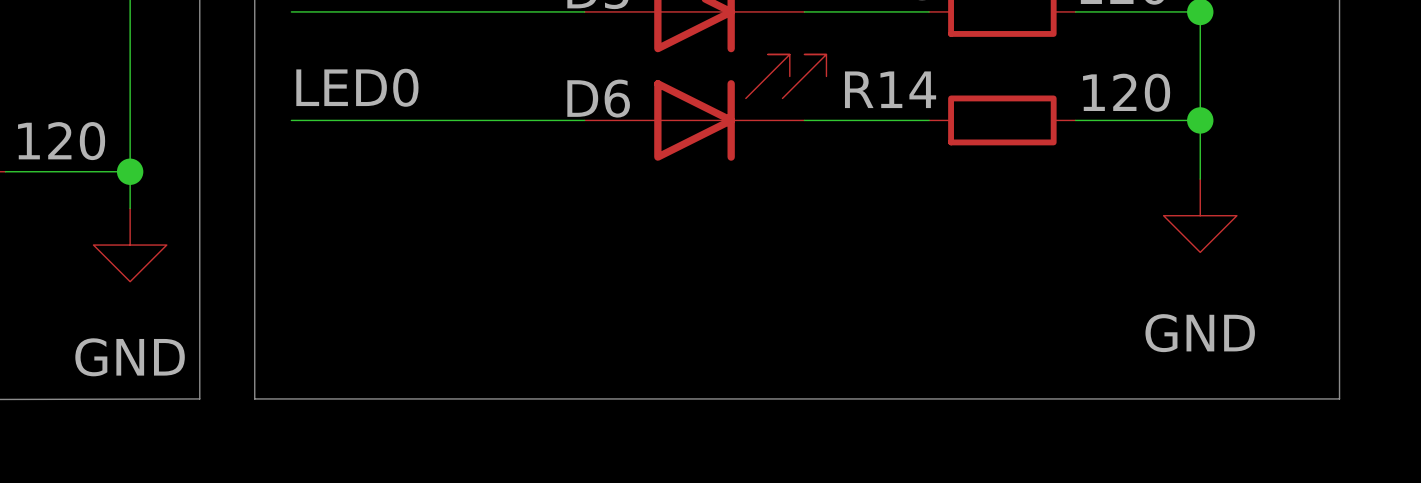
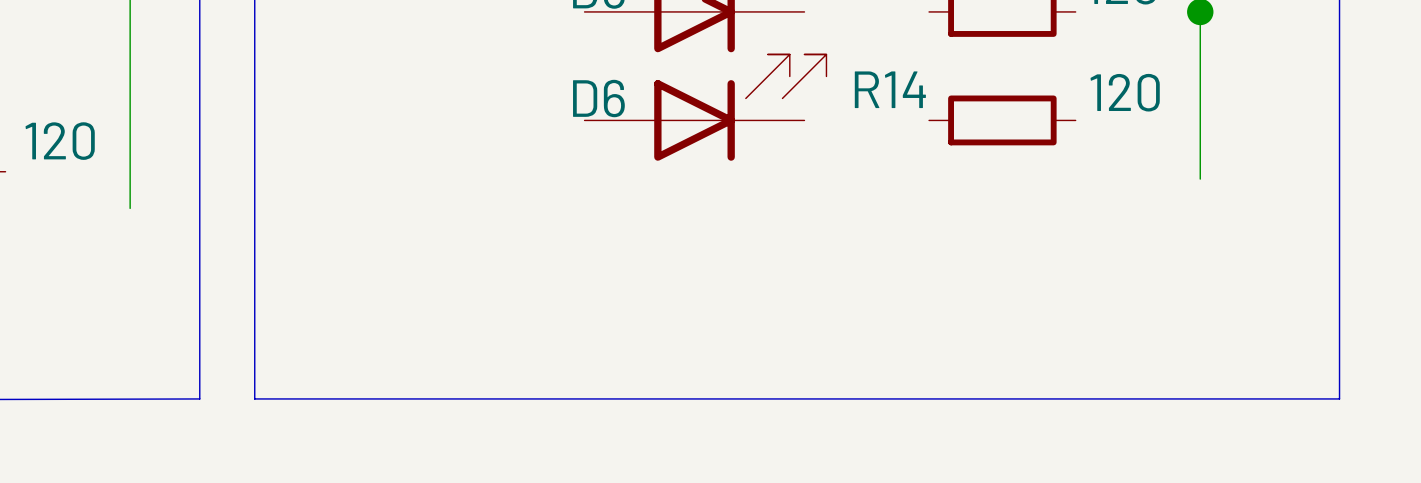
wire: (291, 11) (584, 11) -> none
wire: (804, 11) (929, 11) -> none
wire: (1075, 11) (1200, 11) -> none
label: LED0 (357, 87) -> none
wire: (291, 120) (584, 120) -> none
wire: (804, 120) (929, 120) -> none
wire: (1075, 120) (1200, 120) -> none
junction: (1200, 120) -> none
wire: (5, 171) (130, 171) -> none
junction: (130, 171) -> none
power symbol: GND (1200, 215) -> none
power symbol: GND (130, 245) -> none

